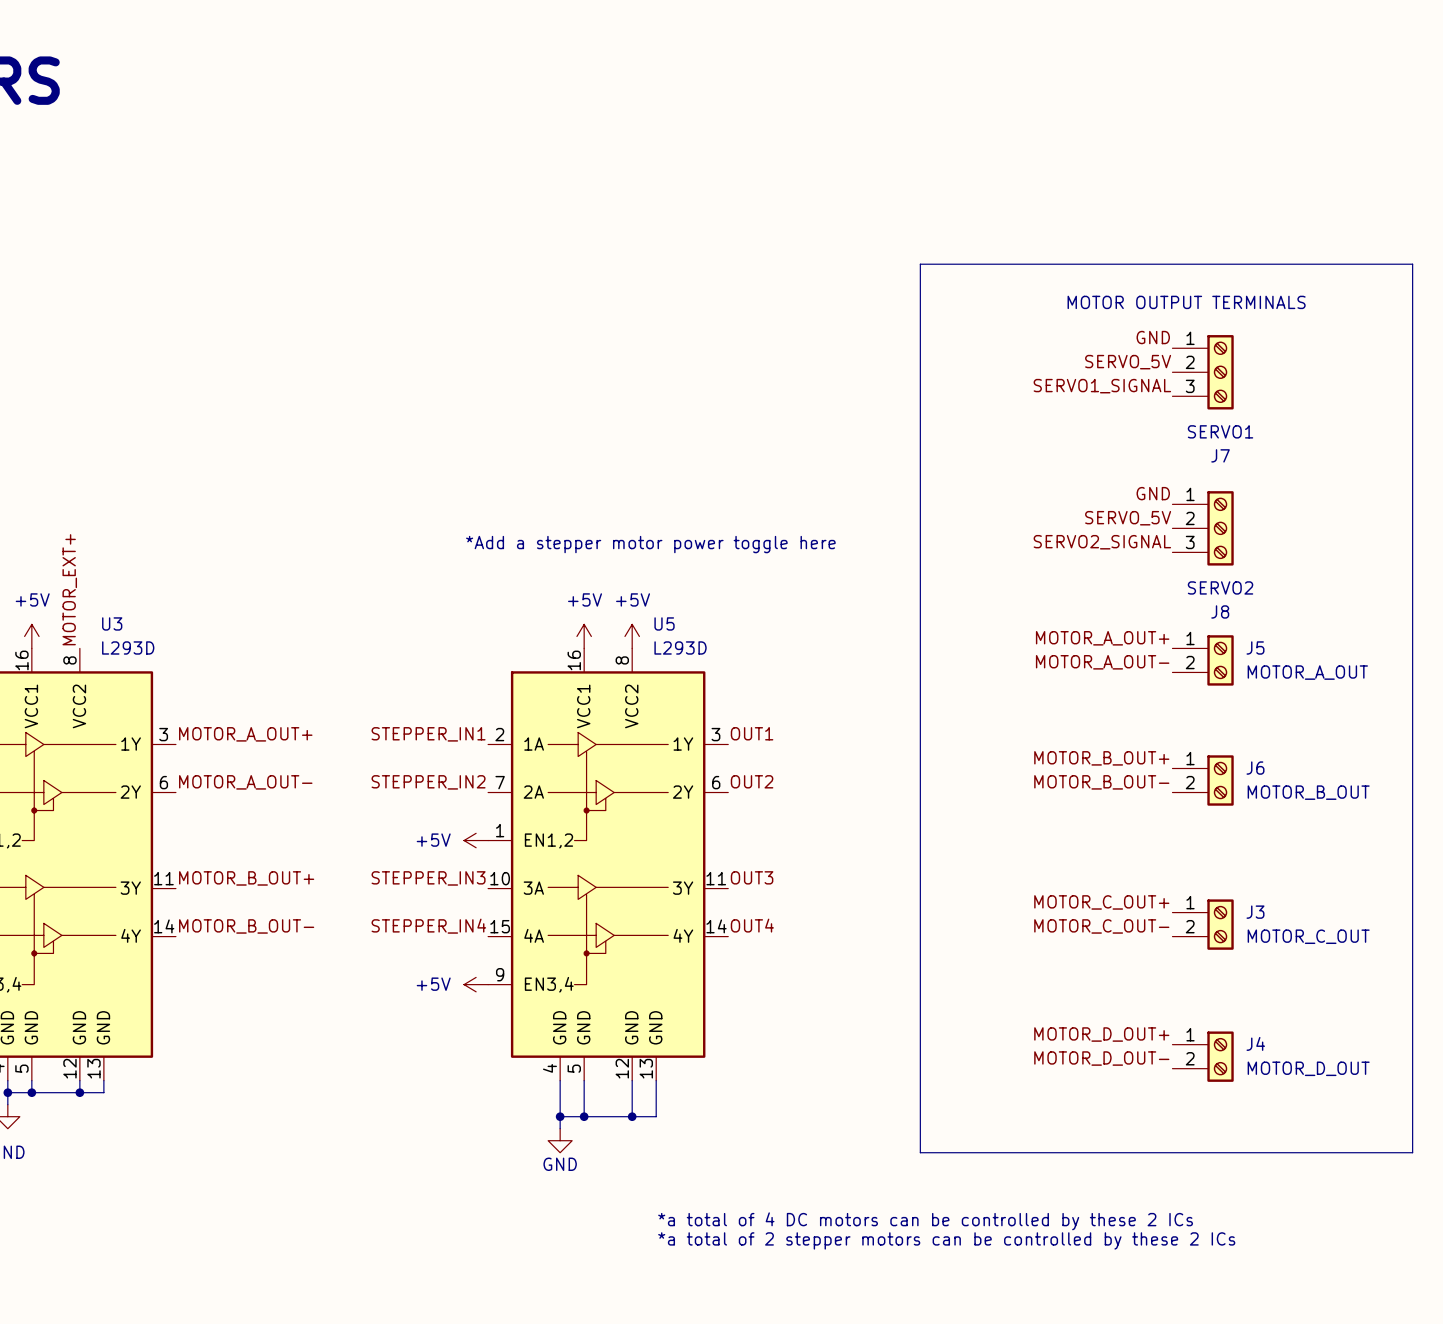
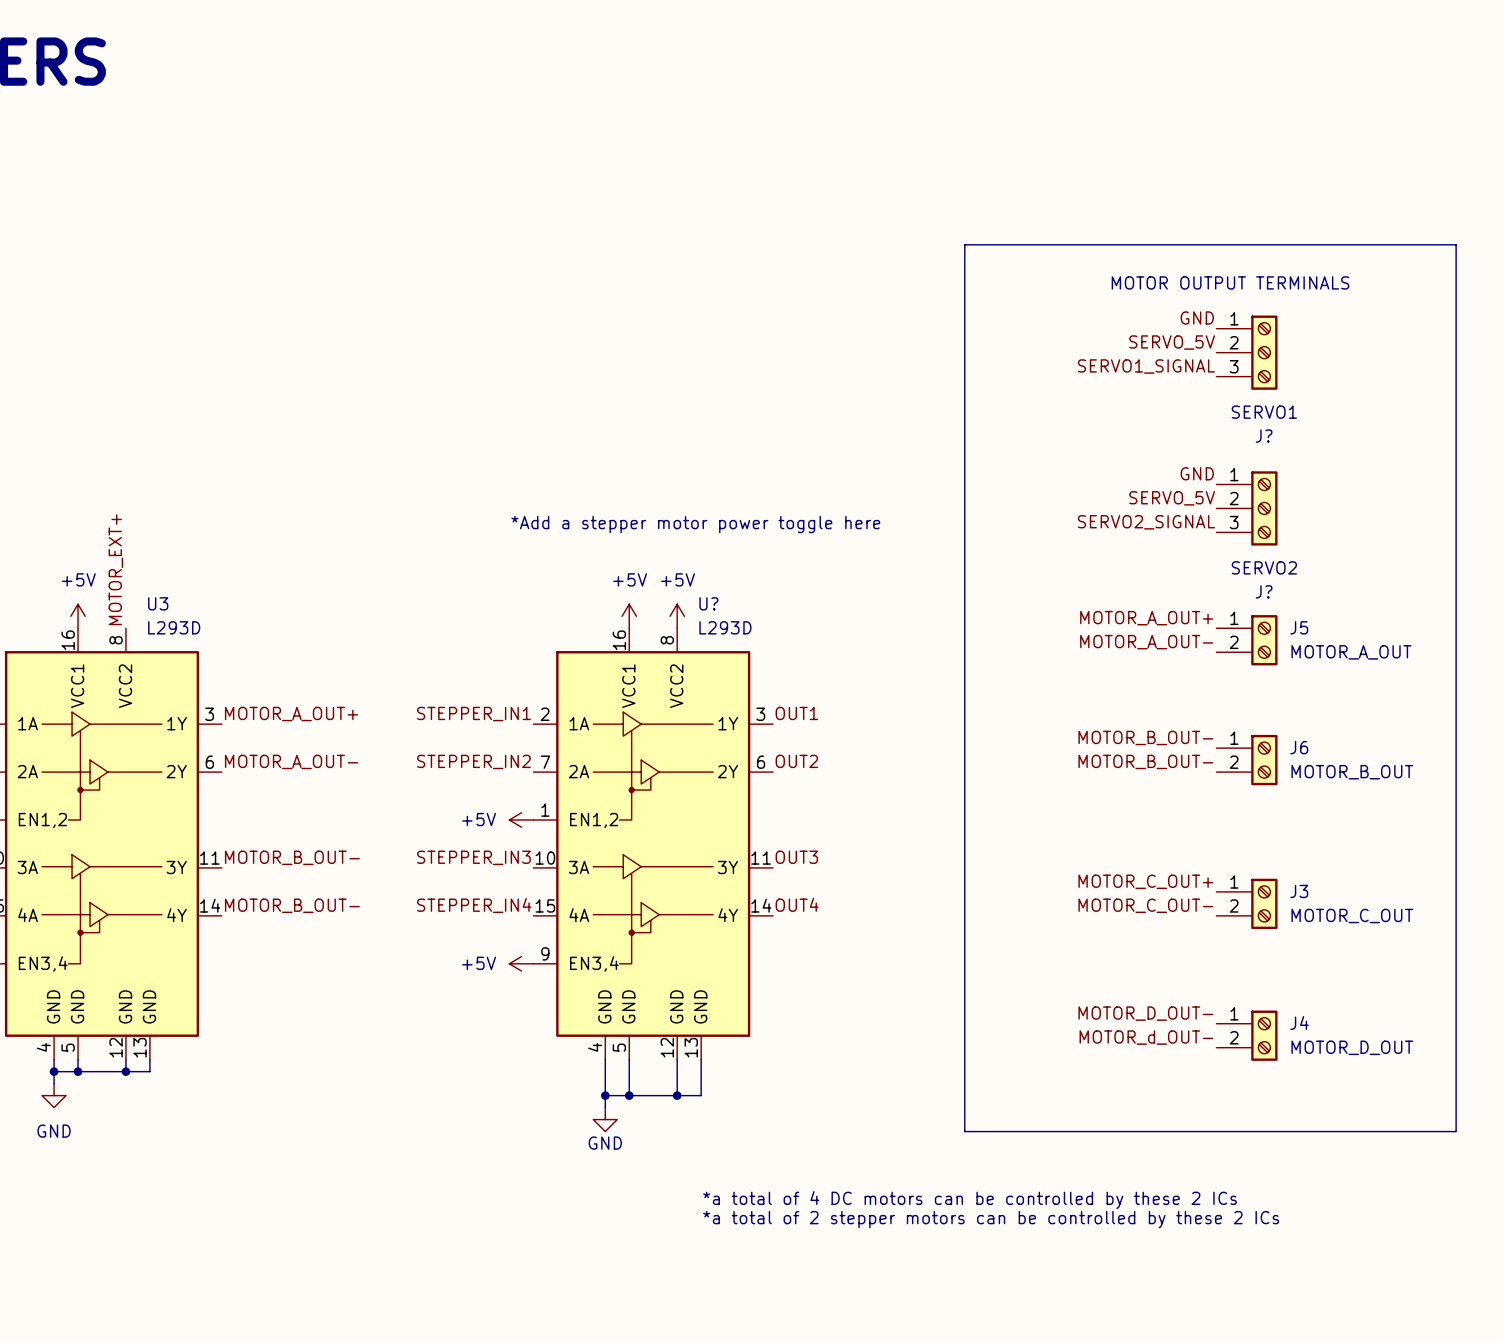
J7 name: J7 (1220, 455) -> J? (1264, 436)
J8 name: J8 (1220, 611) -> J? (1264, 591)
U5 name: U5 (664, 623) -> U? (708, 603)
label: MOTOR_B_OUT+ (1101, 758) -> MOTOR_B_OUT- (1145, 737)
label: MOTOR_B_OUT+ (246, 878) -> MOTOR_B_OUT- (292, 857)
label: MOTOR_D_OUT+ (1101, 1034) -> MOTOR_D_OUT- (1145, 1013)
label: MOTOR_D_OUT- (1101, 1058) -> MOTOR_d_OUT- (1146, 1037)

